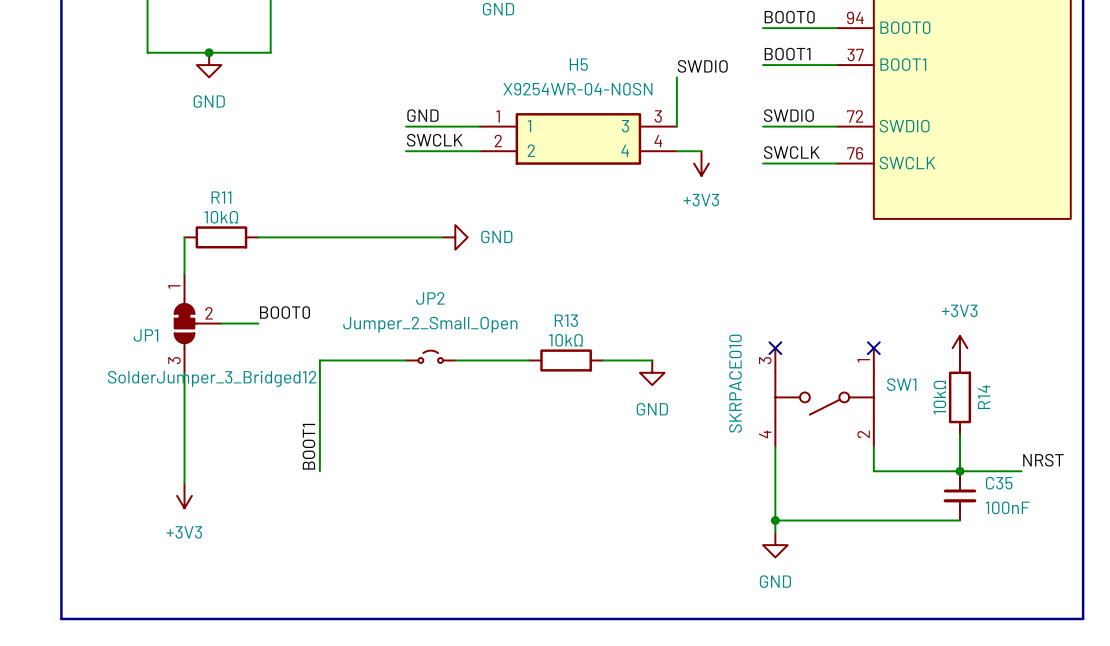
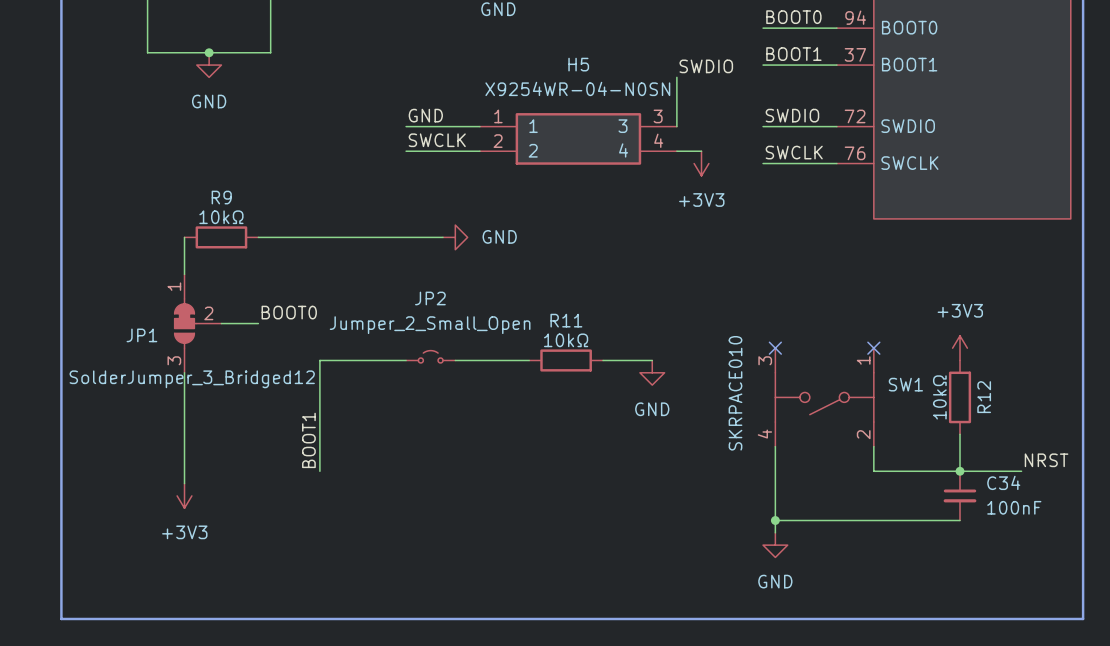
R11 name: R11 (221, 197) -> R9 (221, 197)
R13 name: R13 (566, 320) -> R11 (566, 320)
R14 name: R14 (984, 397) -> R12 (984, 397)
C35 name: C35 (999, 483) -> C34 (1003, 482)

